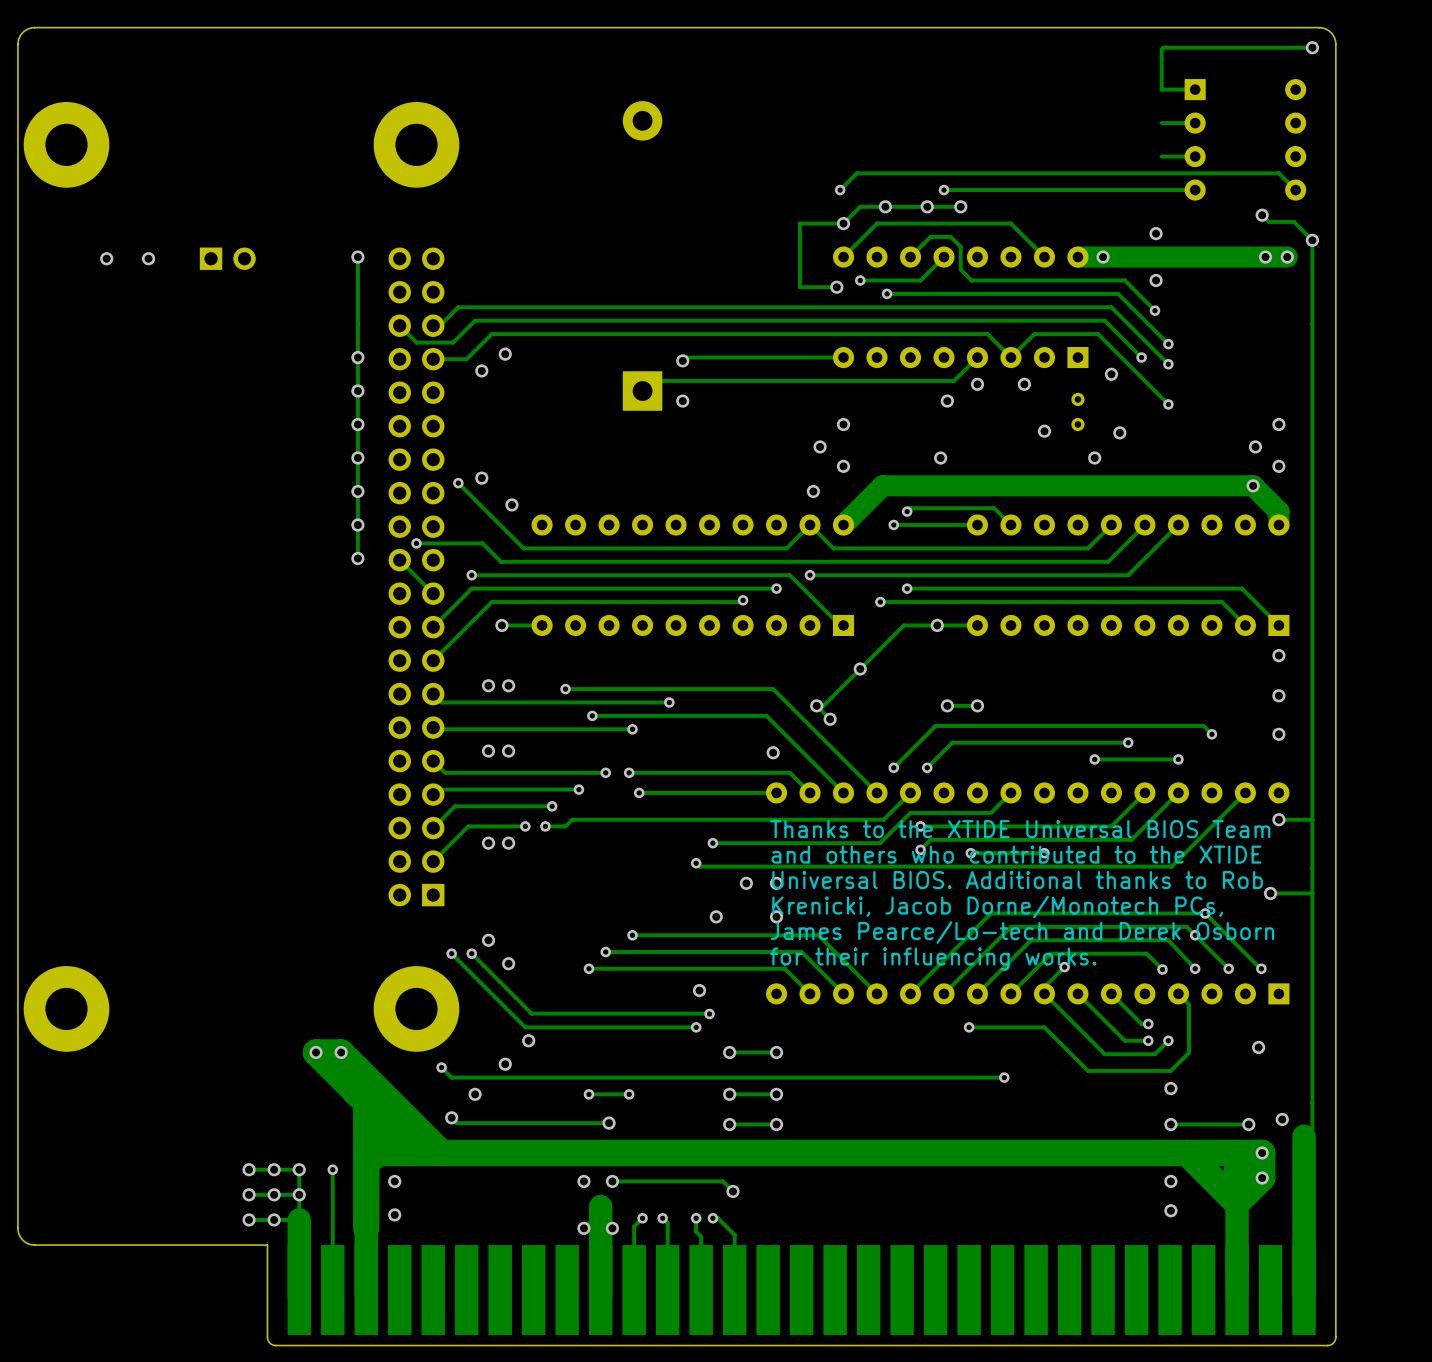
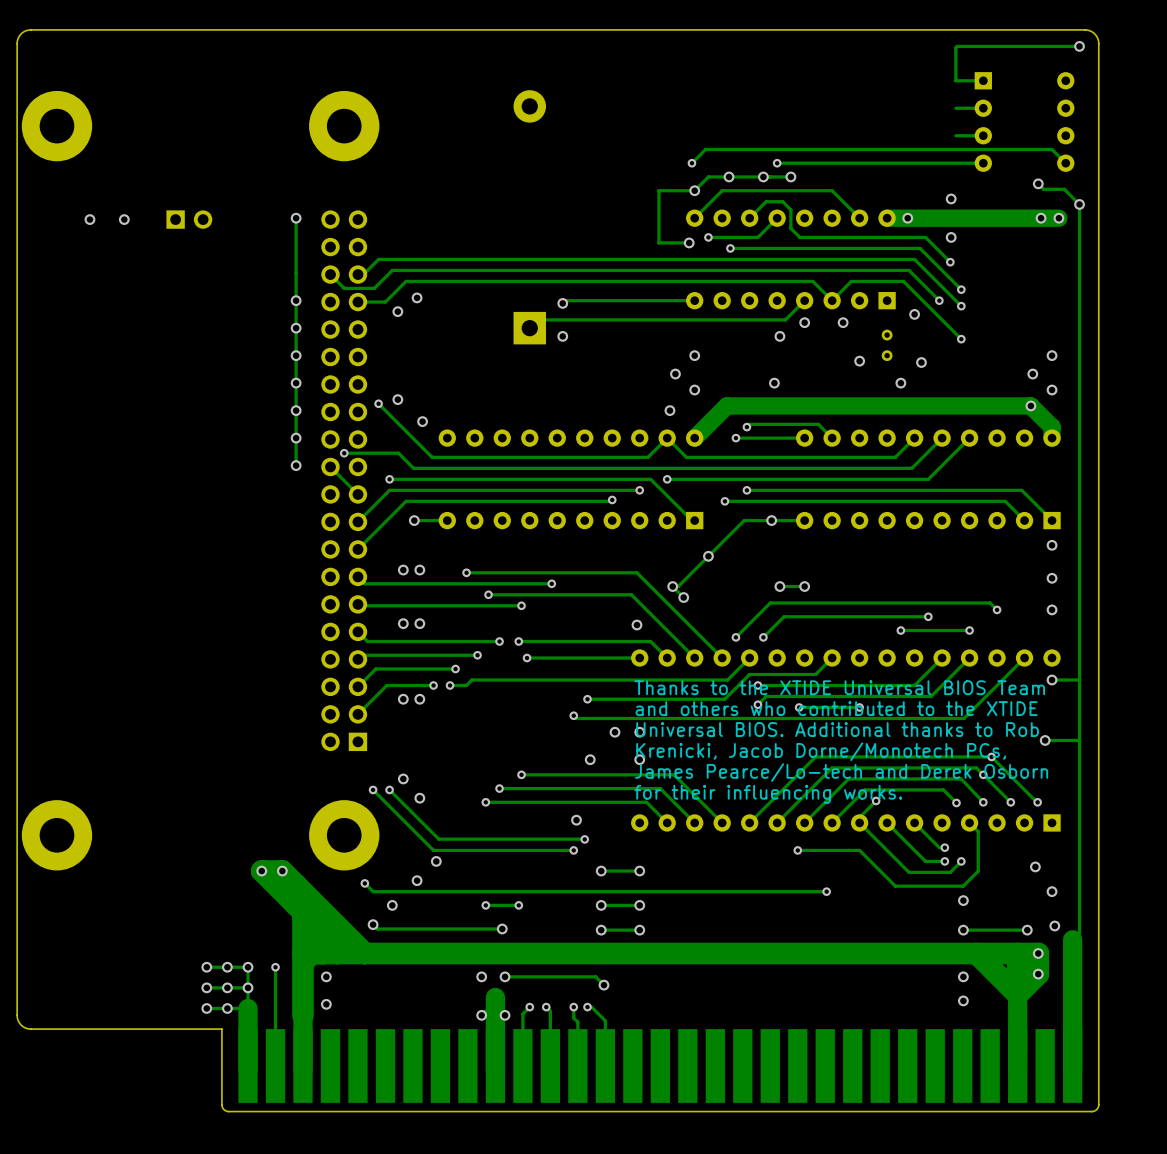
via: none -> (1052, 891)

